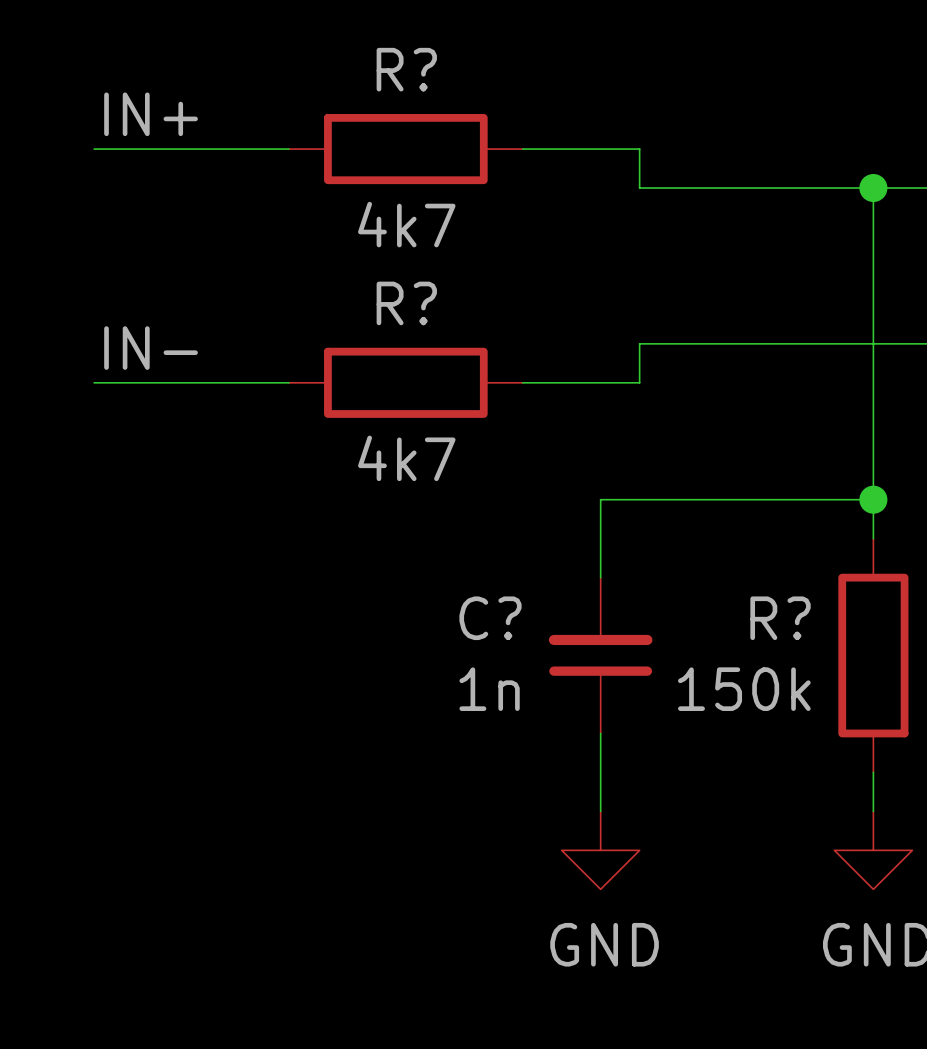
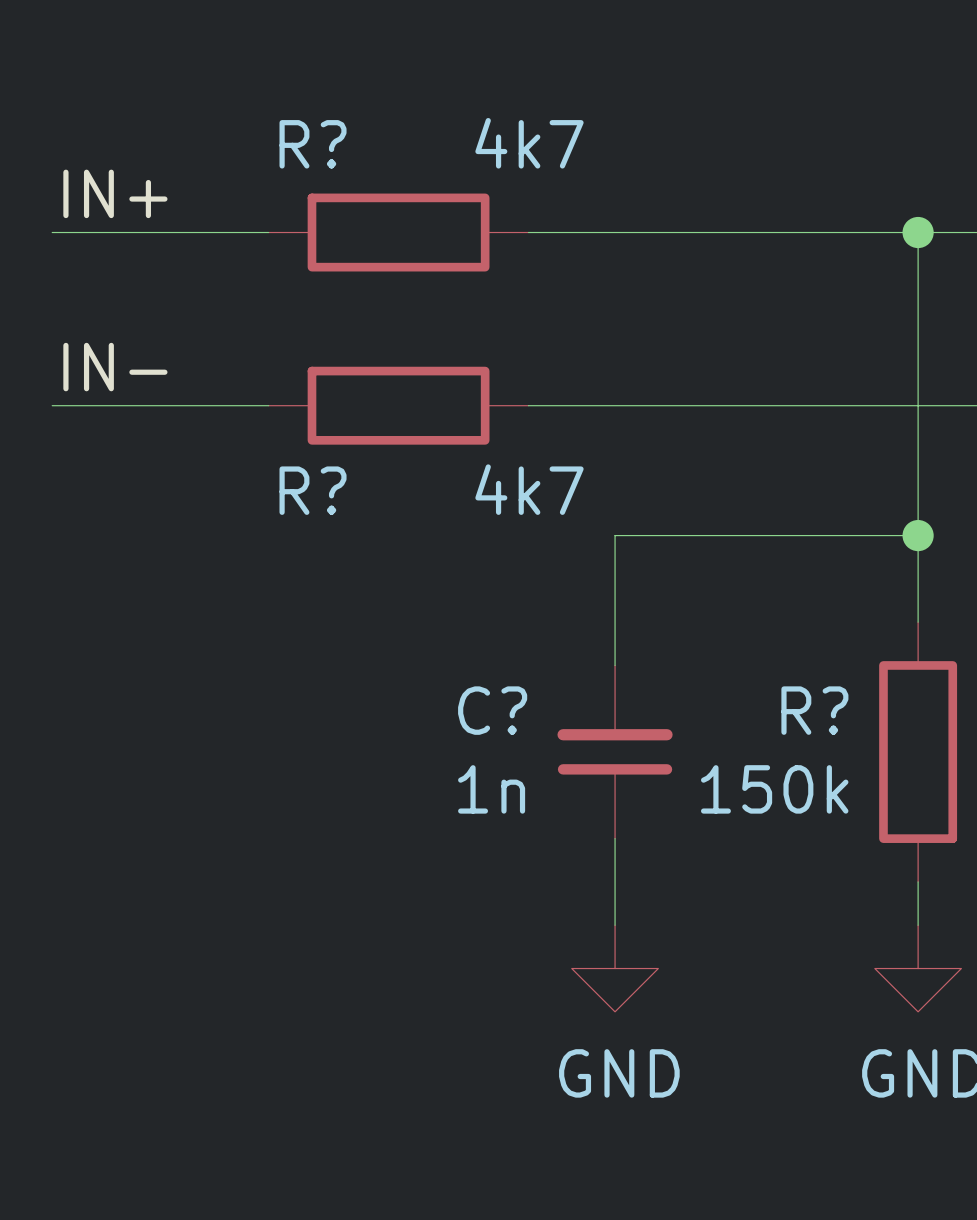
R? name position: R? (406, 69) -> R? (313, 144)
label position: IN+ (151, 114) -> IN+ (115, 193)
wire: (94, 149) (288, 149) -> (52, 232) (268, 232)
R? position: (405, 149) -> (398, 232)
wire: (522, 149) (639, 149) (639, 188) -> (528, 232) (658, 232)
R? value position: 4k7 (406, 224) -> 4k7 (529, 143)
R? name position: R? (406, 303) -> R? (313, 490)
wire: (639, 343) (639, 382) (522, 382) -> (658, 405) (528, 405)
label position: IN- (151, 348) -> IN- (115, 367)
wire: (94, 382) (288, 382) -> (52, 405) (268, 405)
R? position: (405, 382) -> (398, 405)
R? value position: 4k7 (406, 458) -> 4k7 (529, 489)
wire: (600, 499) (873, 499) -> (615, 578) (615, 535) (918, 535)
junction position: (873, 499) -> (918, 535)

